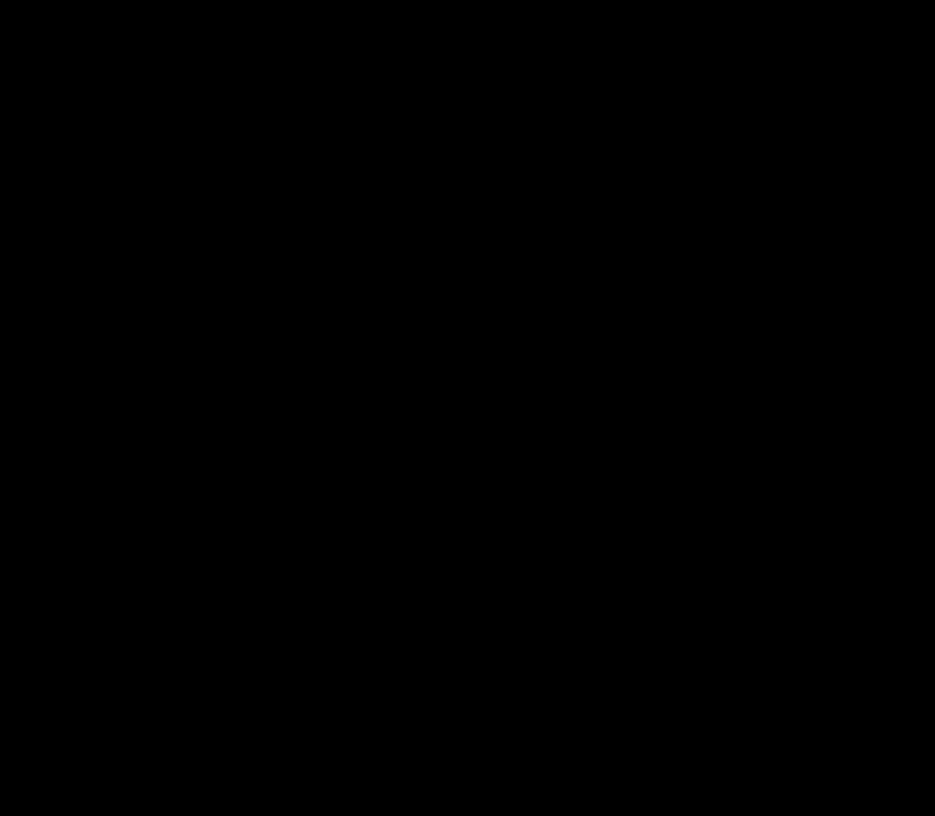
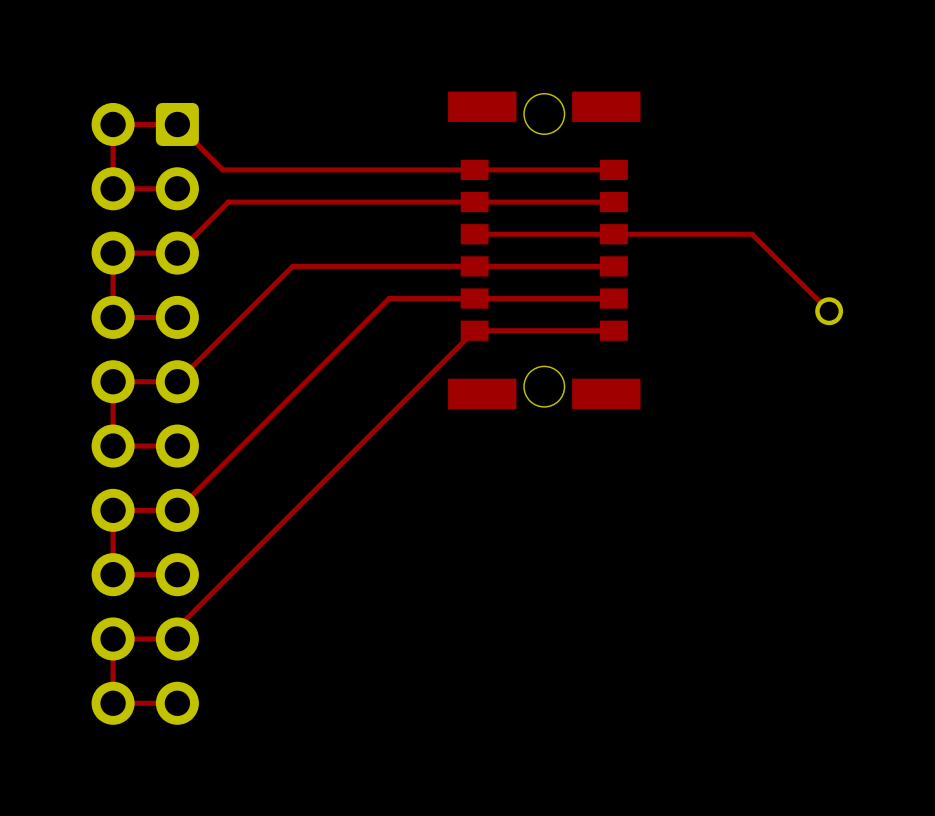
top track: none -> (613, 169) (222, 169) (177, 124) (113, 124) (113, 188) (177, 188)
top track: none -> (613, 202) (228, 202) (177, 253) (113, 253) (113, 317) (177, 317)
top track: none -> (474, 234) (752, 234) (829, 311)
part: none -> (544, 250)
top track: none -> (613, 266) (292, 266) (177, 381) (113, 381) (113, 446) (177, 446)
top track: none -> (613, 298) (389, 298) (177, 510) (113, 510) (113, 574) (177, 574)
part: none -> (829, 311)
top track: none -> (613, 330) (474, 330) (177, 627) (177, 638) (113, 638) (113, 703) (177, 703)
part: none -> (145, 413)

